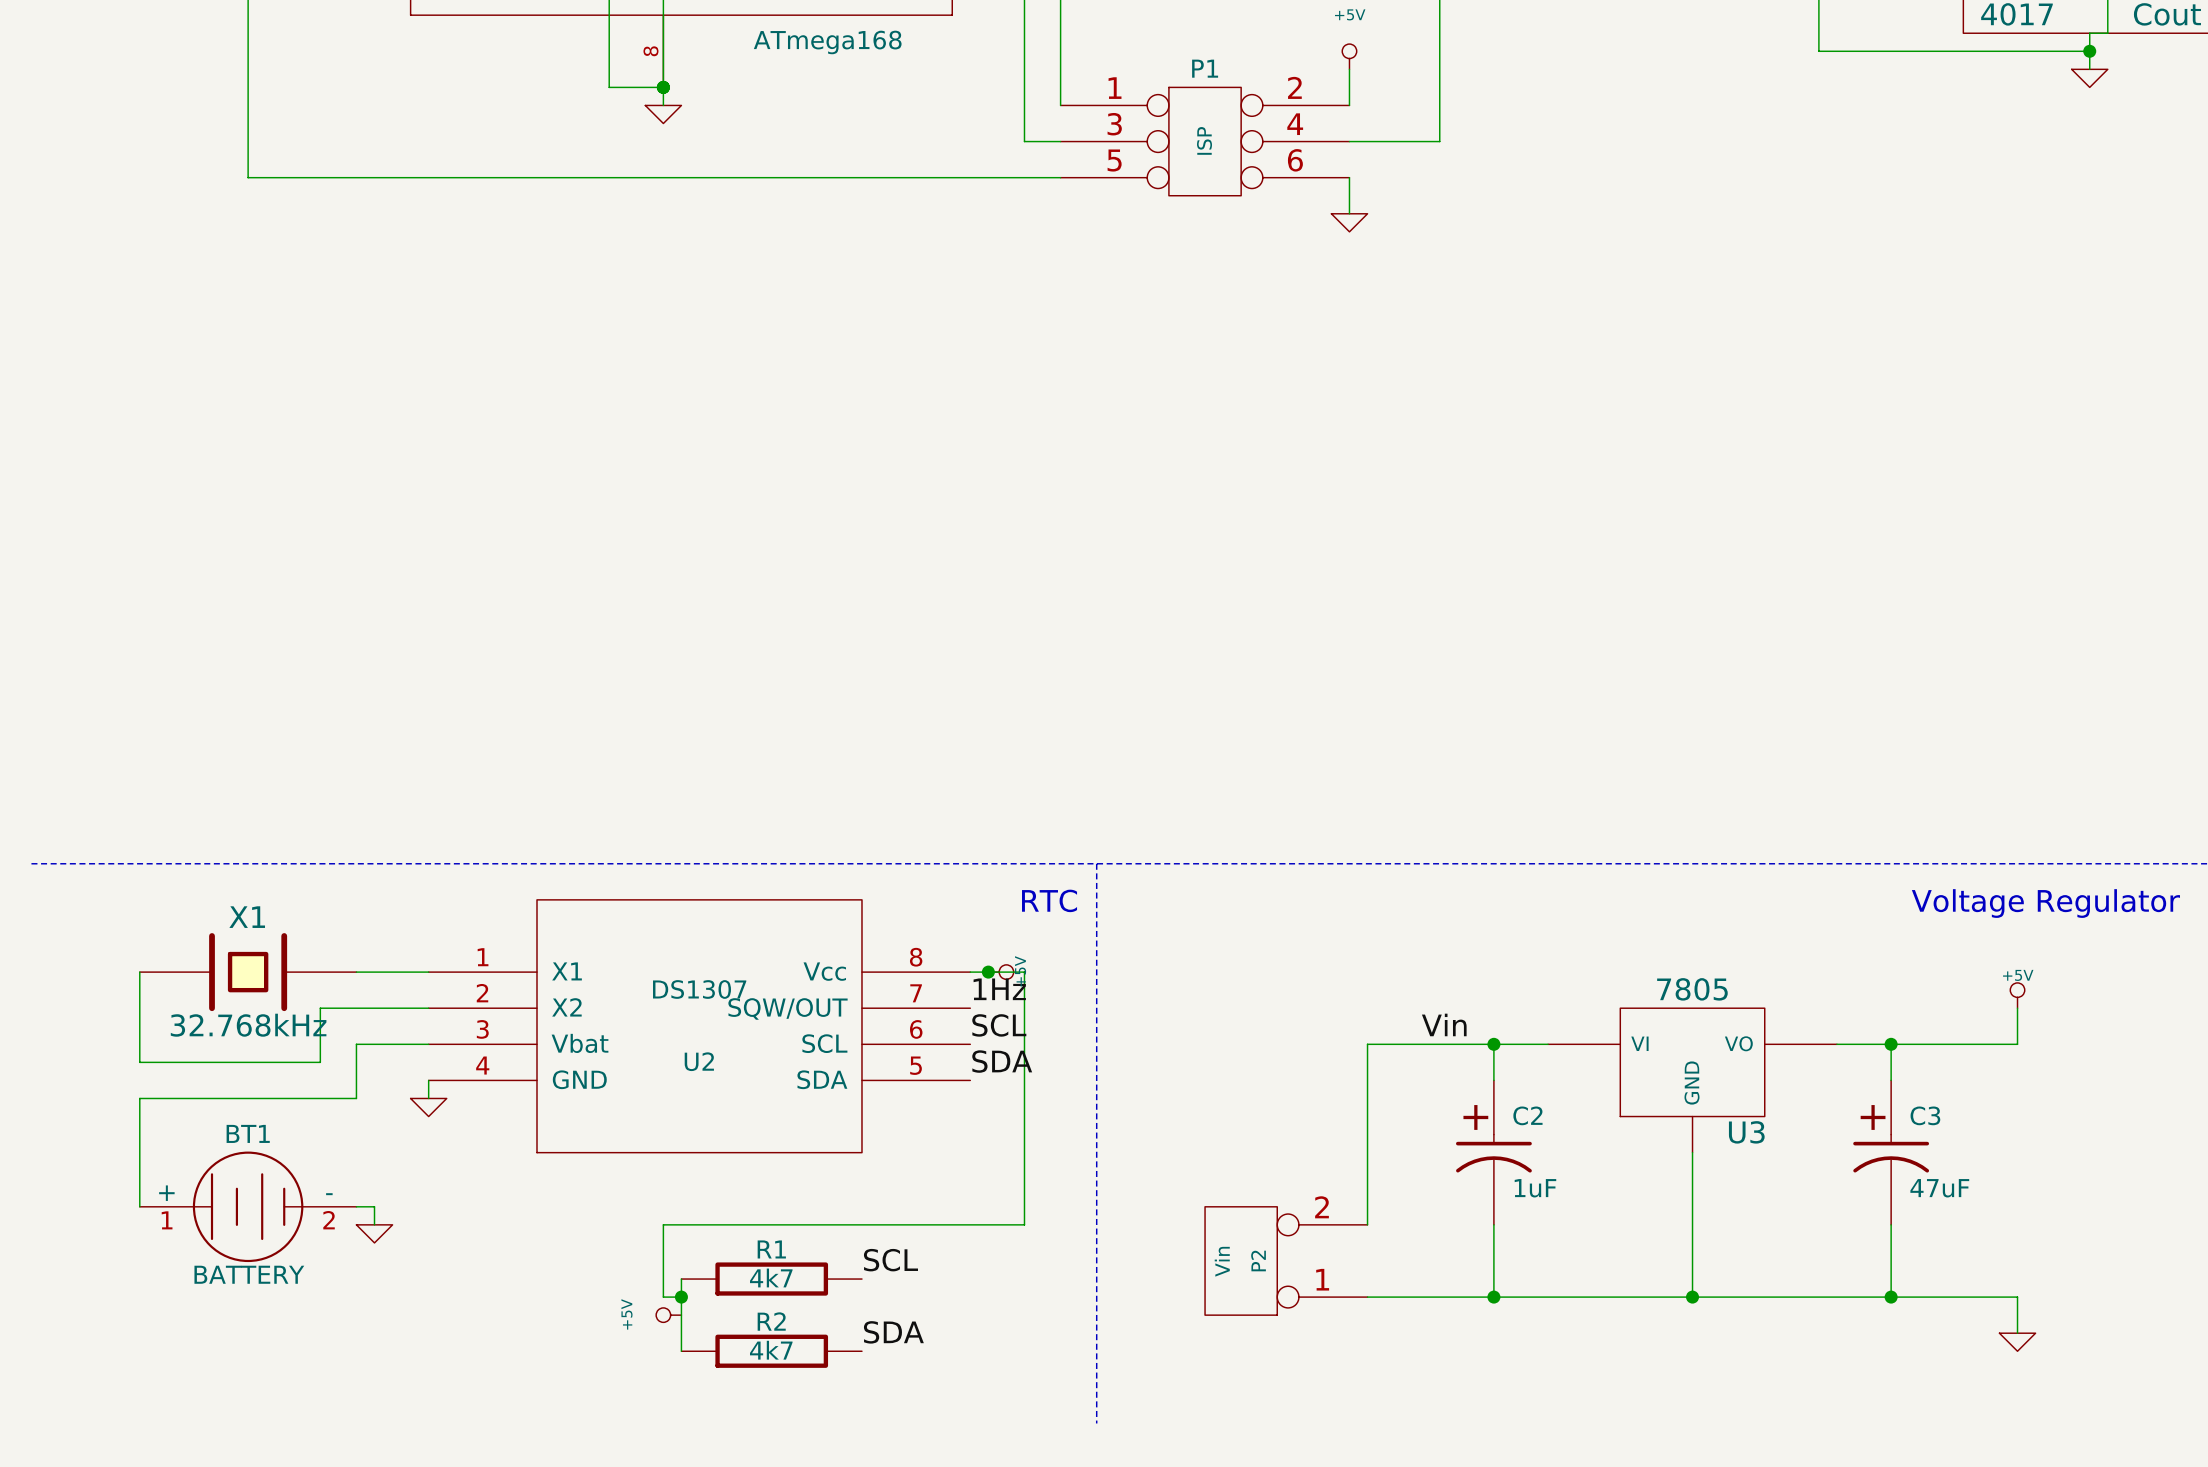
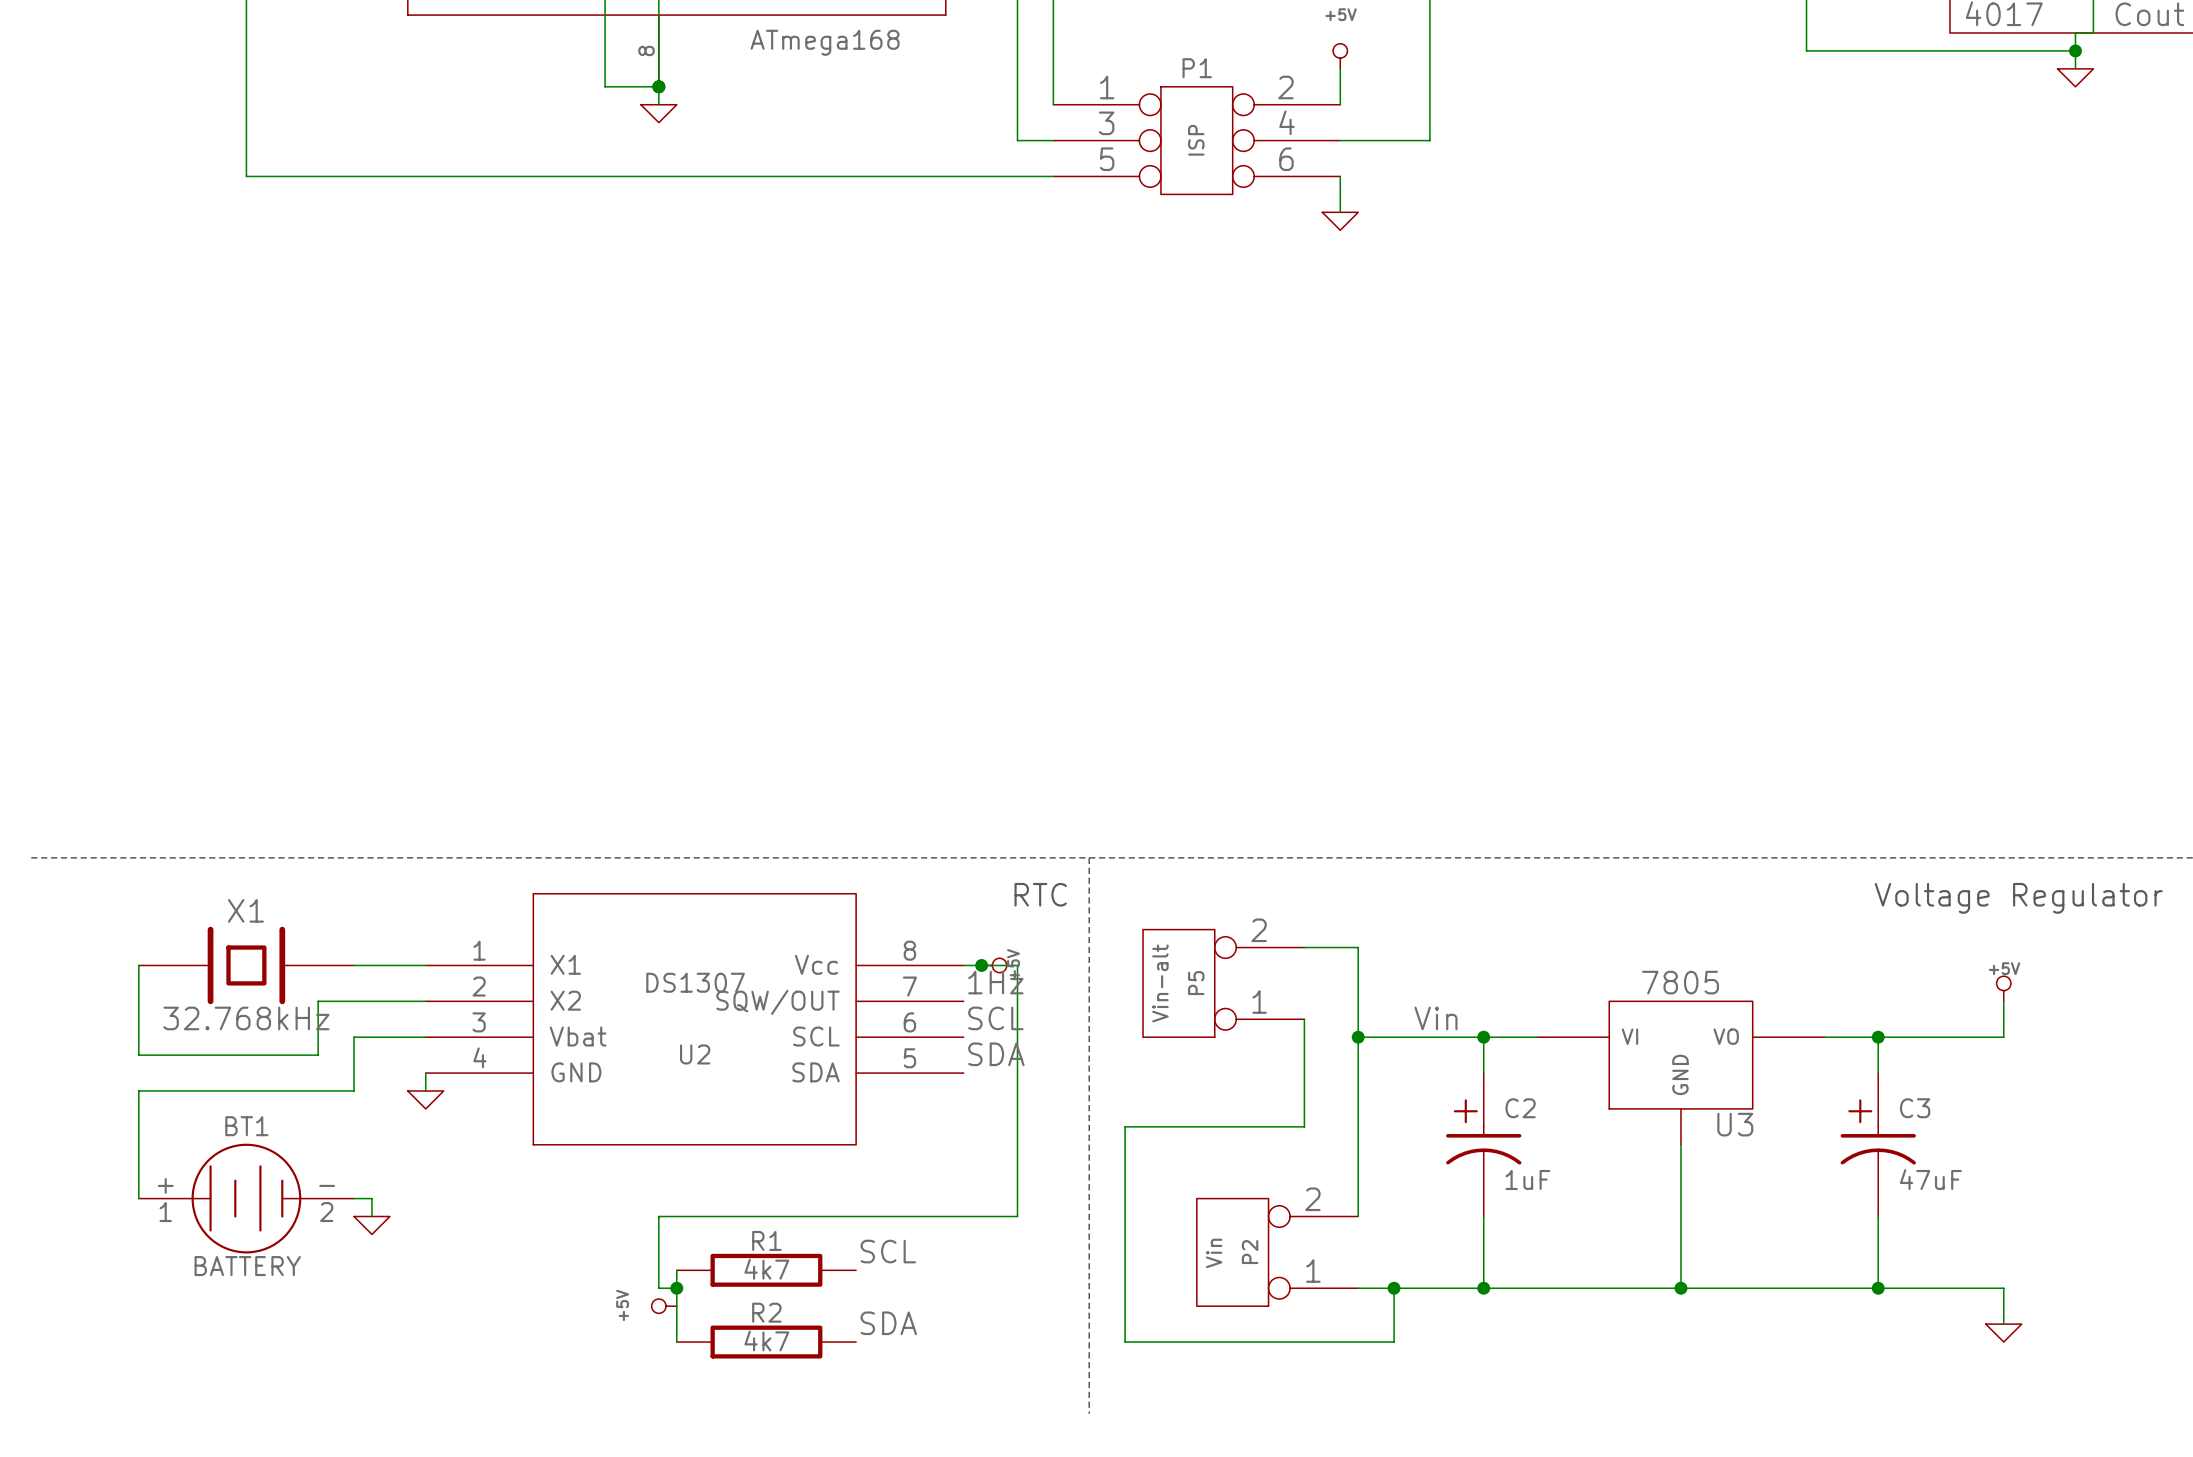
wire: none -> (1304, 947) (1358, 947) (1358, 1037)
P5: none -> Vin-alt (1223, 983)
wire: none -> (1304, 1019) (1304, 1126) (1125, 1126) (1125, 1342) (1394, 1342) (1394, 1288)
junction: none -> (1358, 1037)
junction: none -> (1394, 1288)

